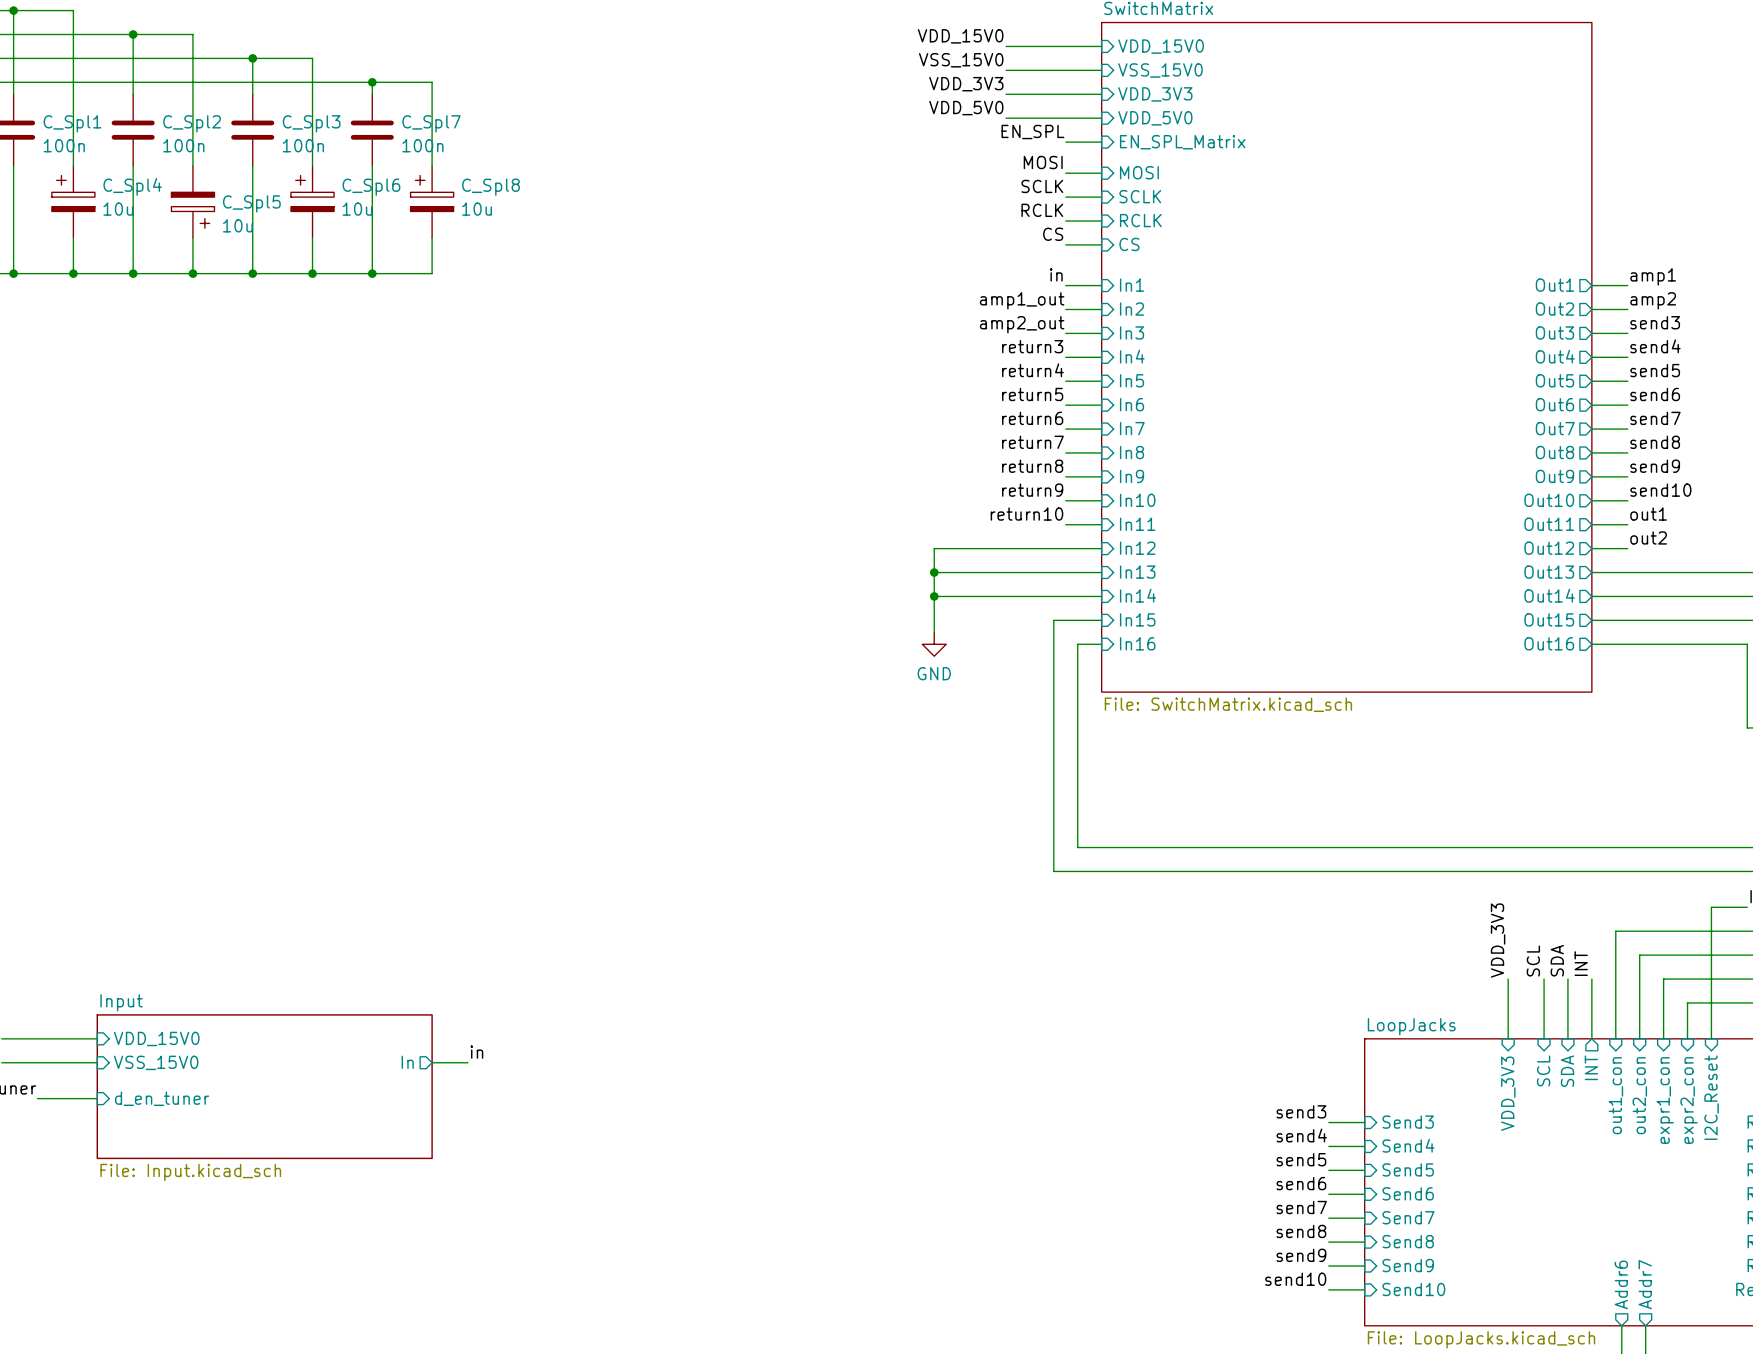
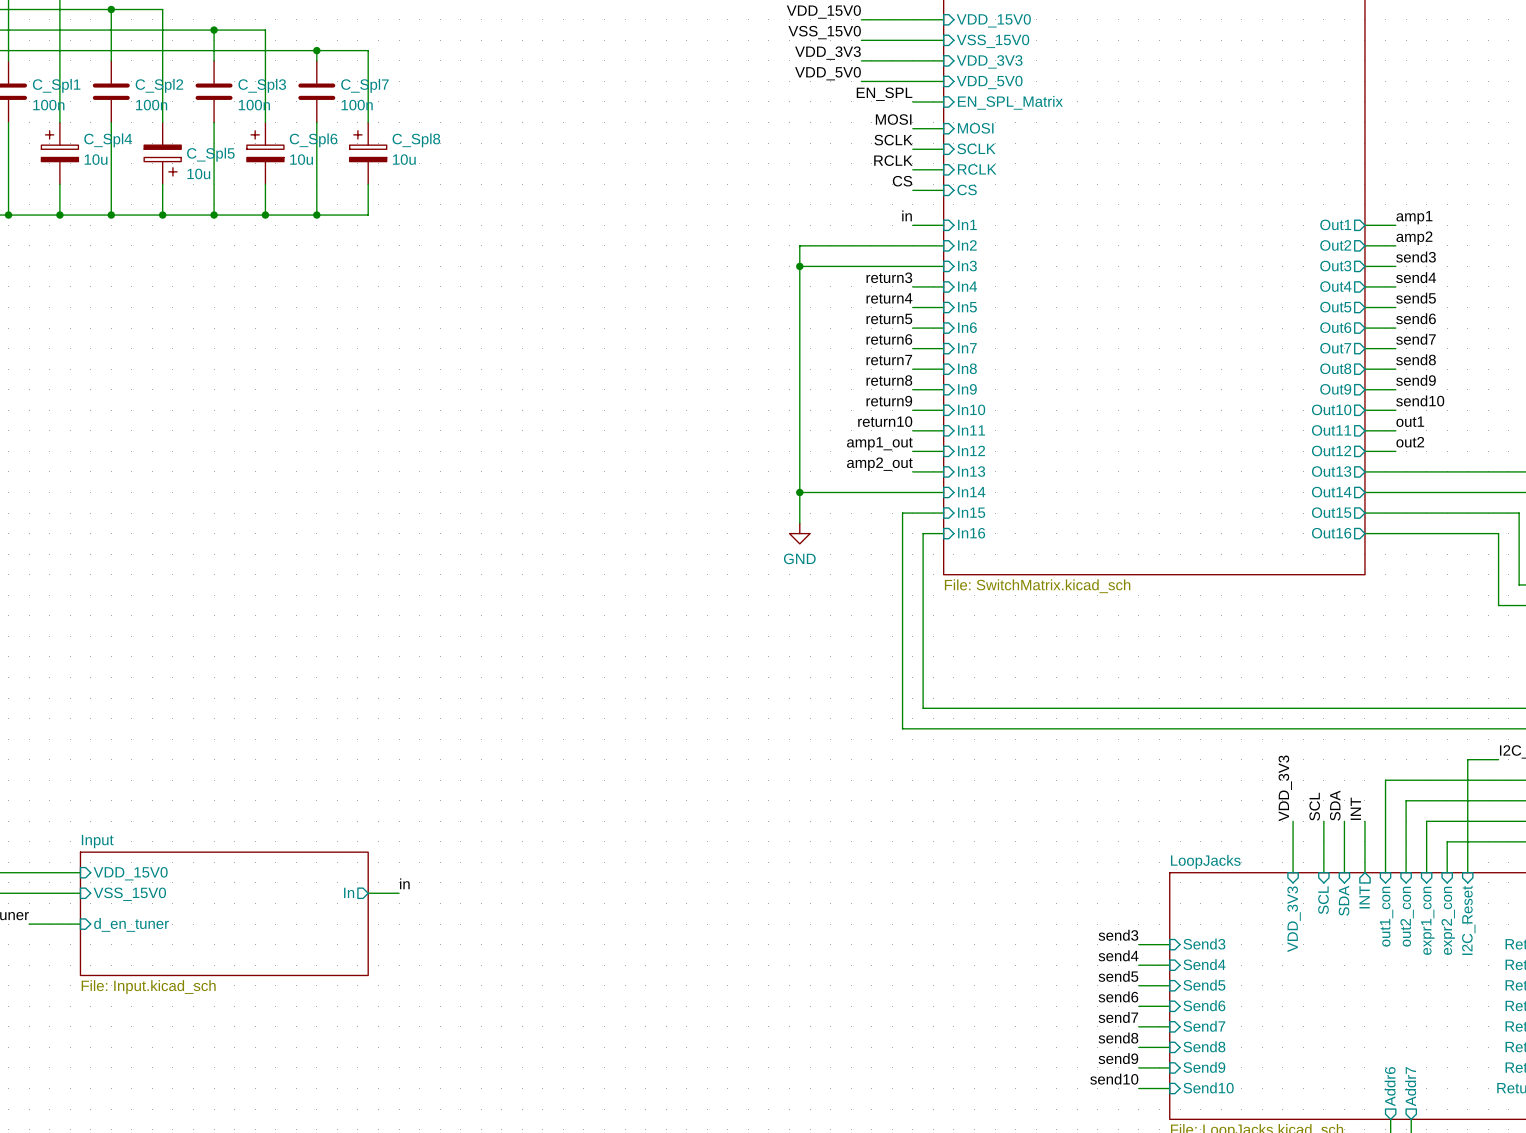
label: amp1_out (1022, 300) -> none
label: amp2_out (1022, 324) -> none
wire: none -> (799, 266) (912, 266)
junction: none -> (799, 266)
label: none -> amp1_out (879, 443)
wire: (934, 548) (1065, 548) -> (799, 451) (799, 245) (912, 245)
label: none -> amp2_out (879, 464)
wire: (934, 572) (1065, 572) -> none
junction: (934, 572) -> none

